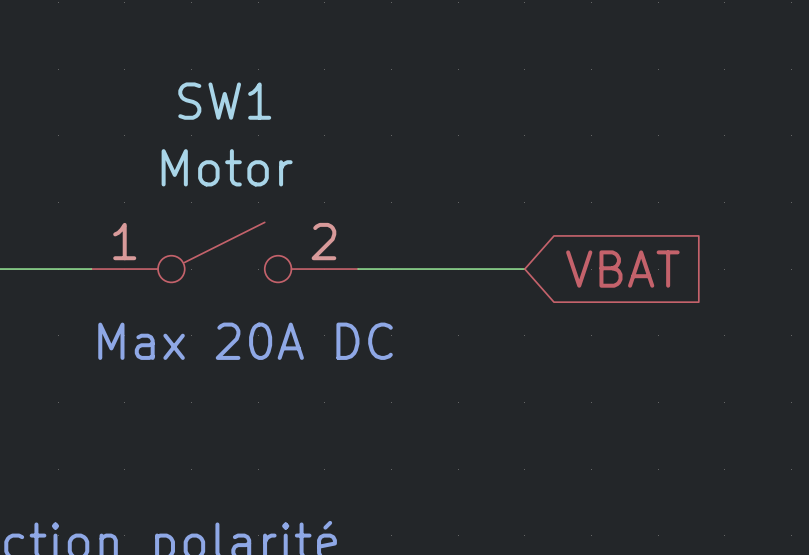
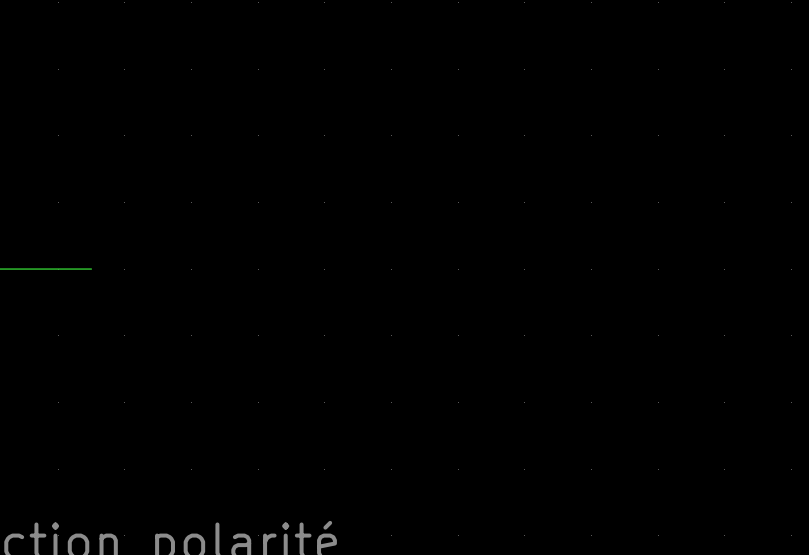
SW1: Motor (224, 252) -> none
wire: (358, 269) (524, 269) -> none
global label: VBAT (622, 269) -> none
text: Max 20A DC (245, 341) -> none

